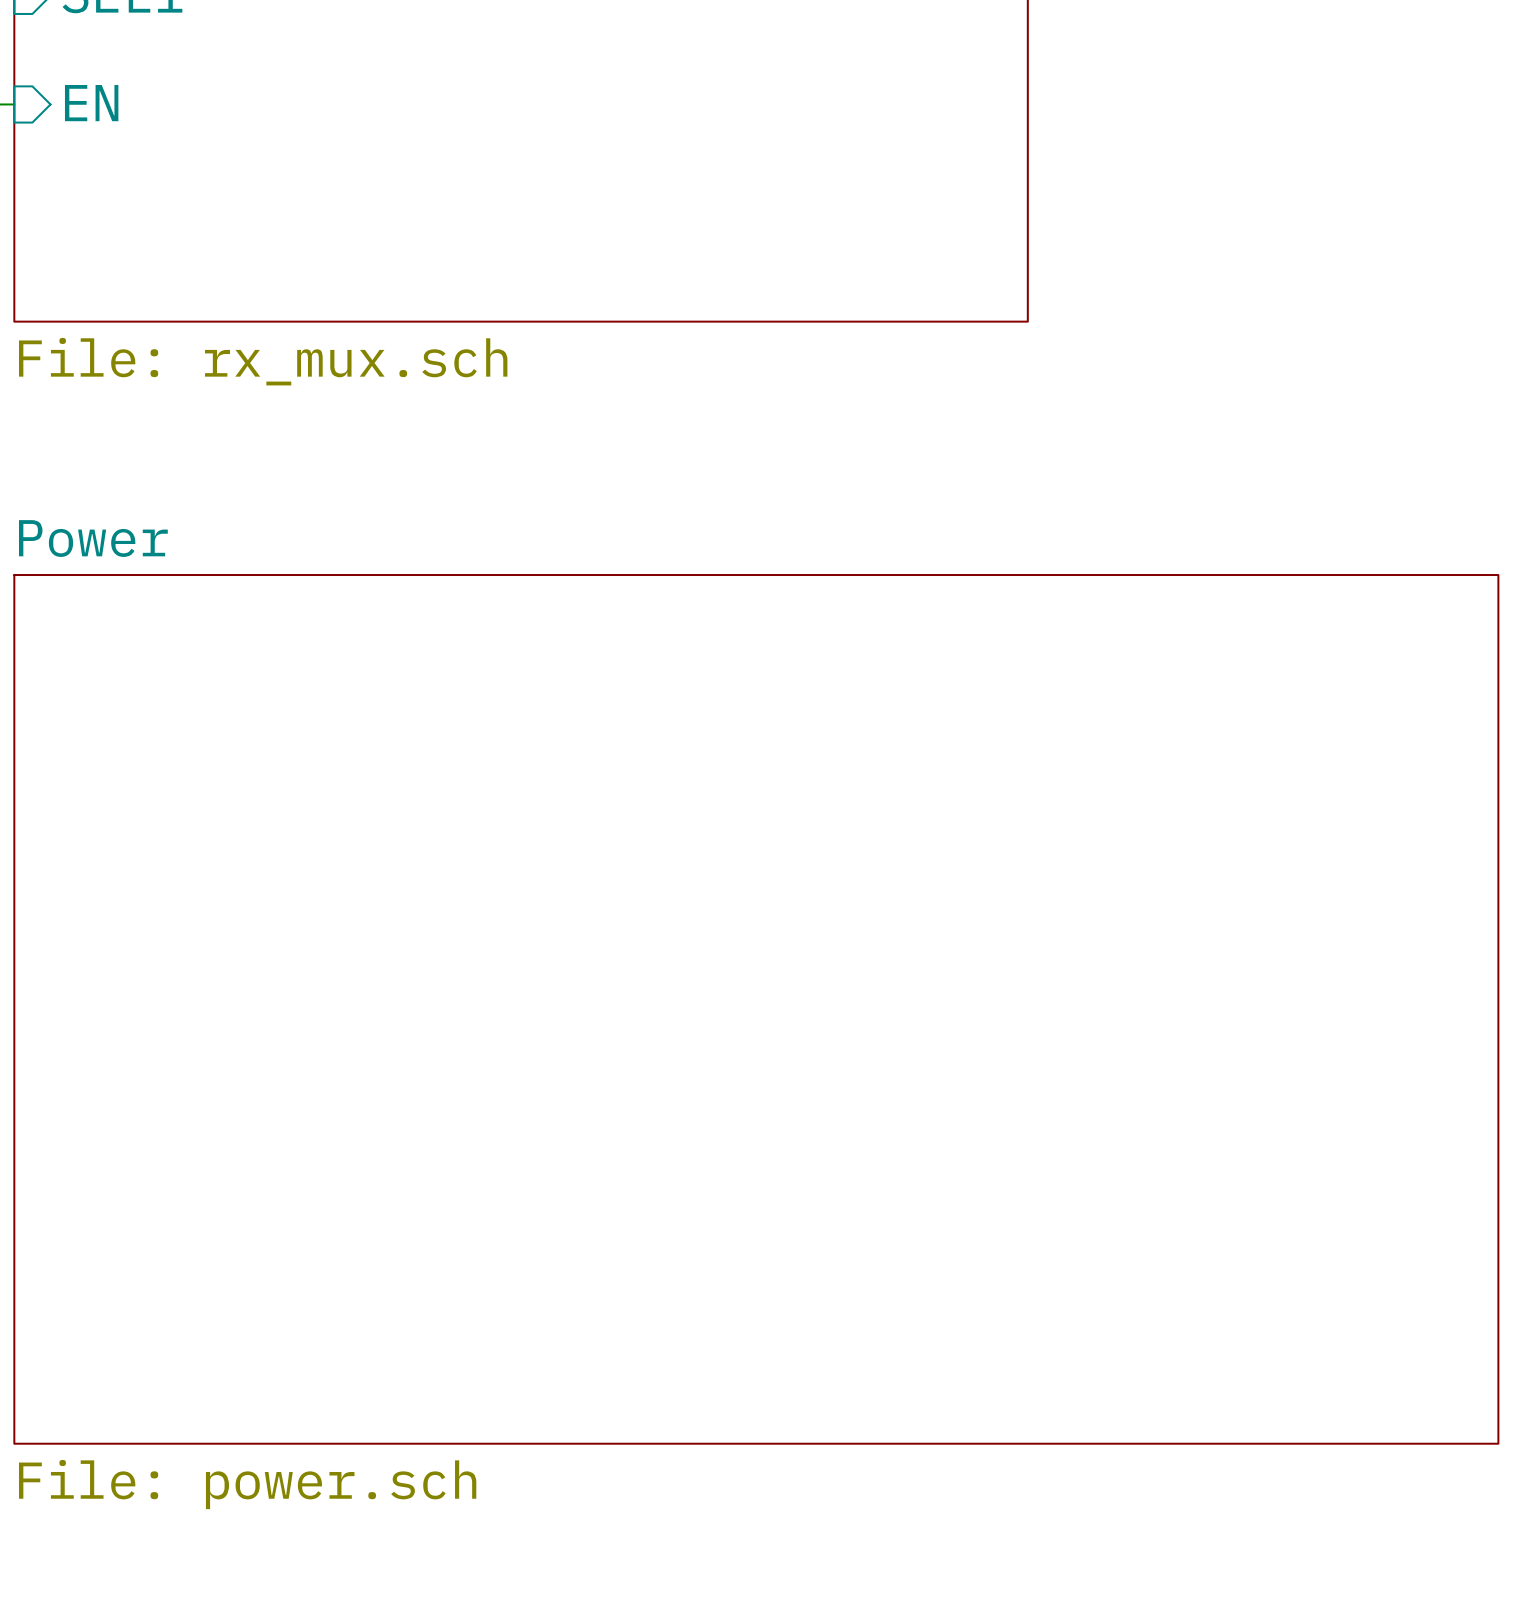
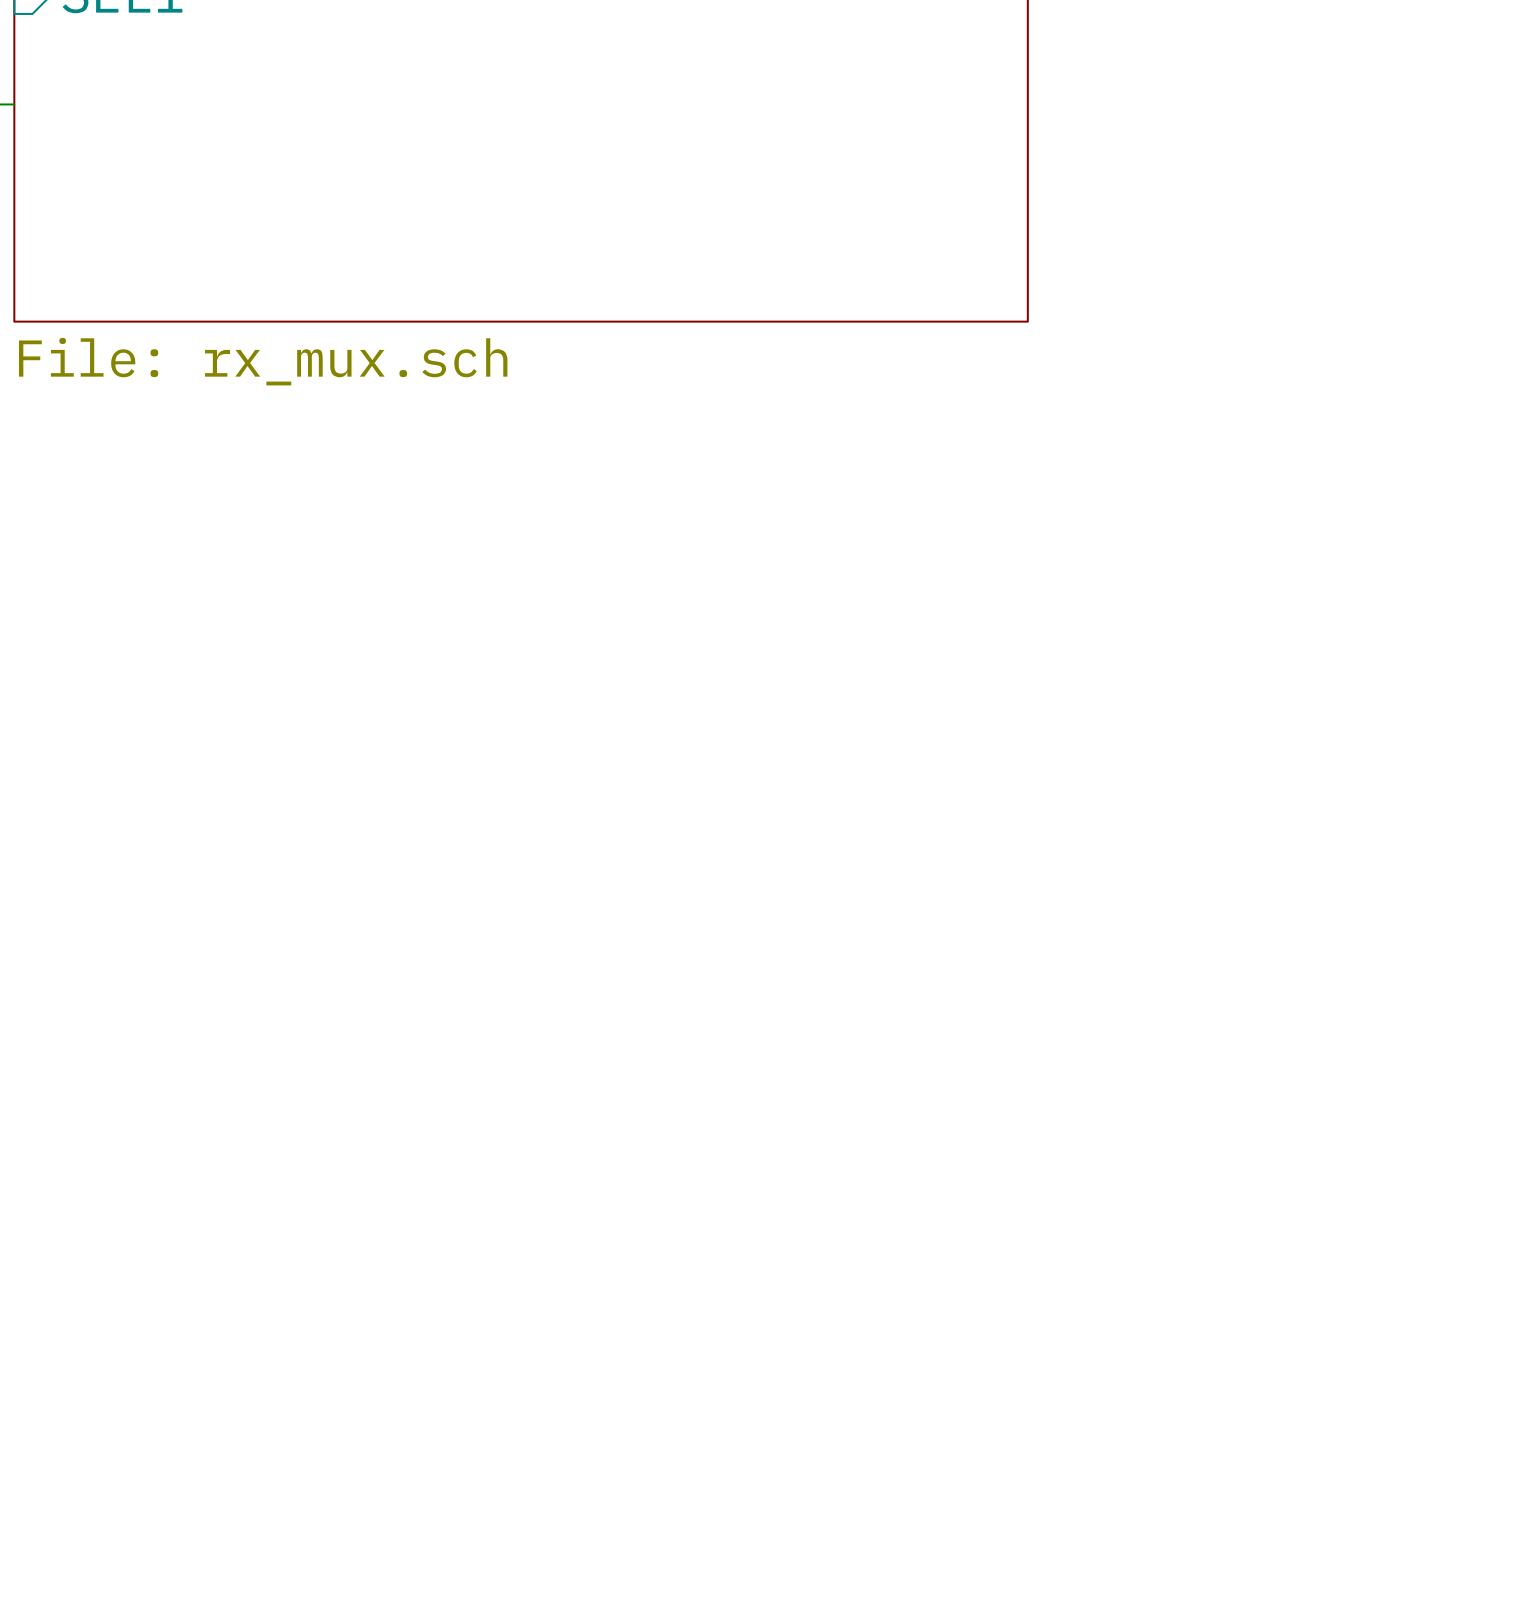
sheet pin: EN (91, 103) -> none
sheet Power: File: power.sch (756, 1009) -> none

